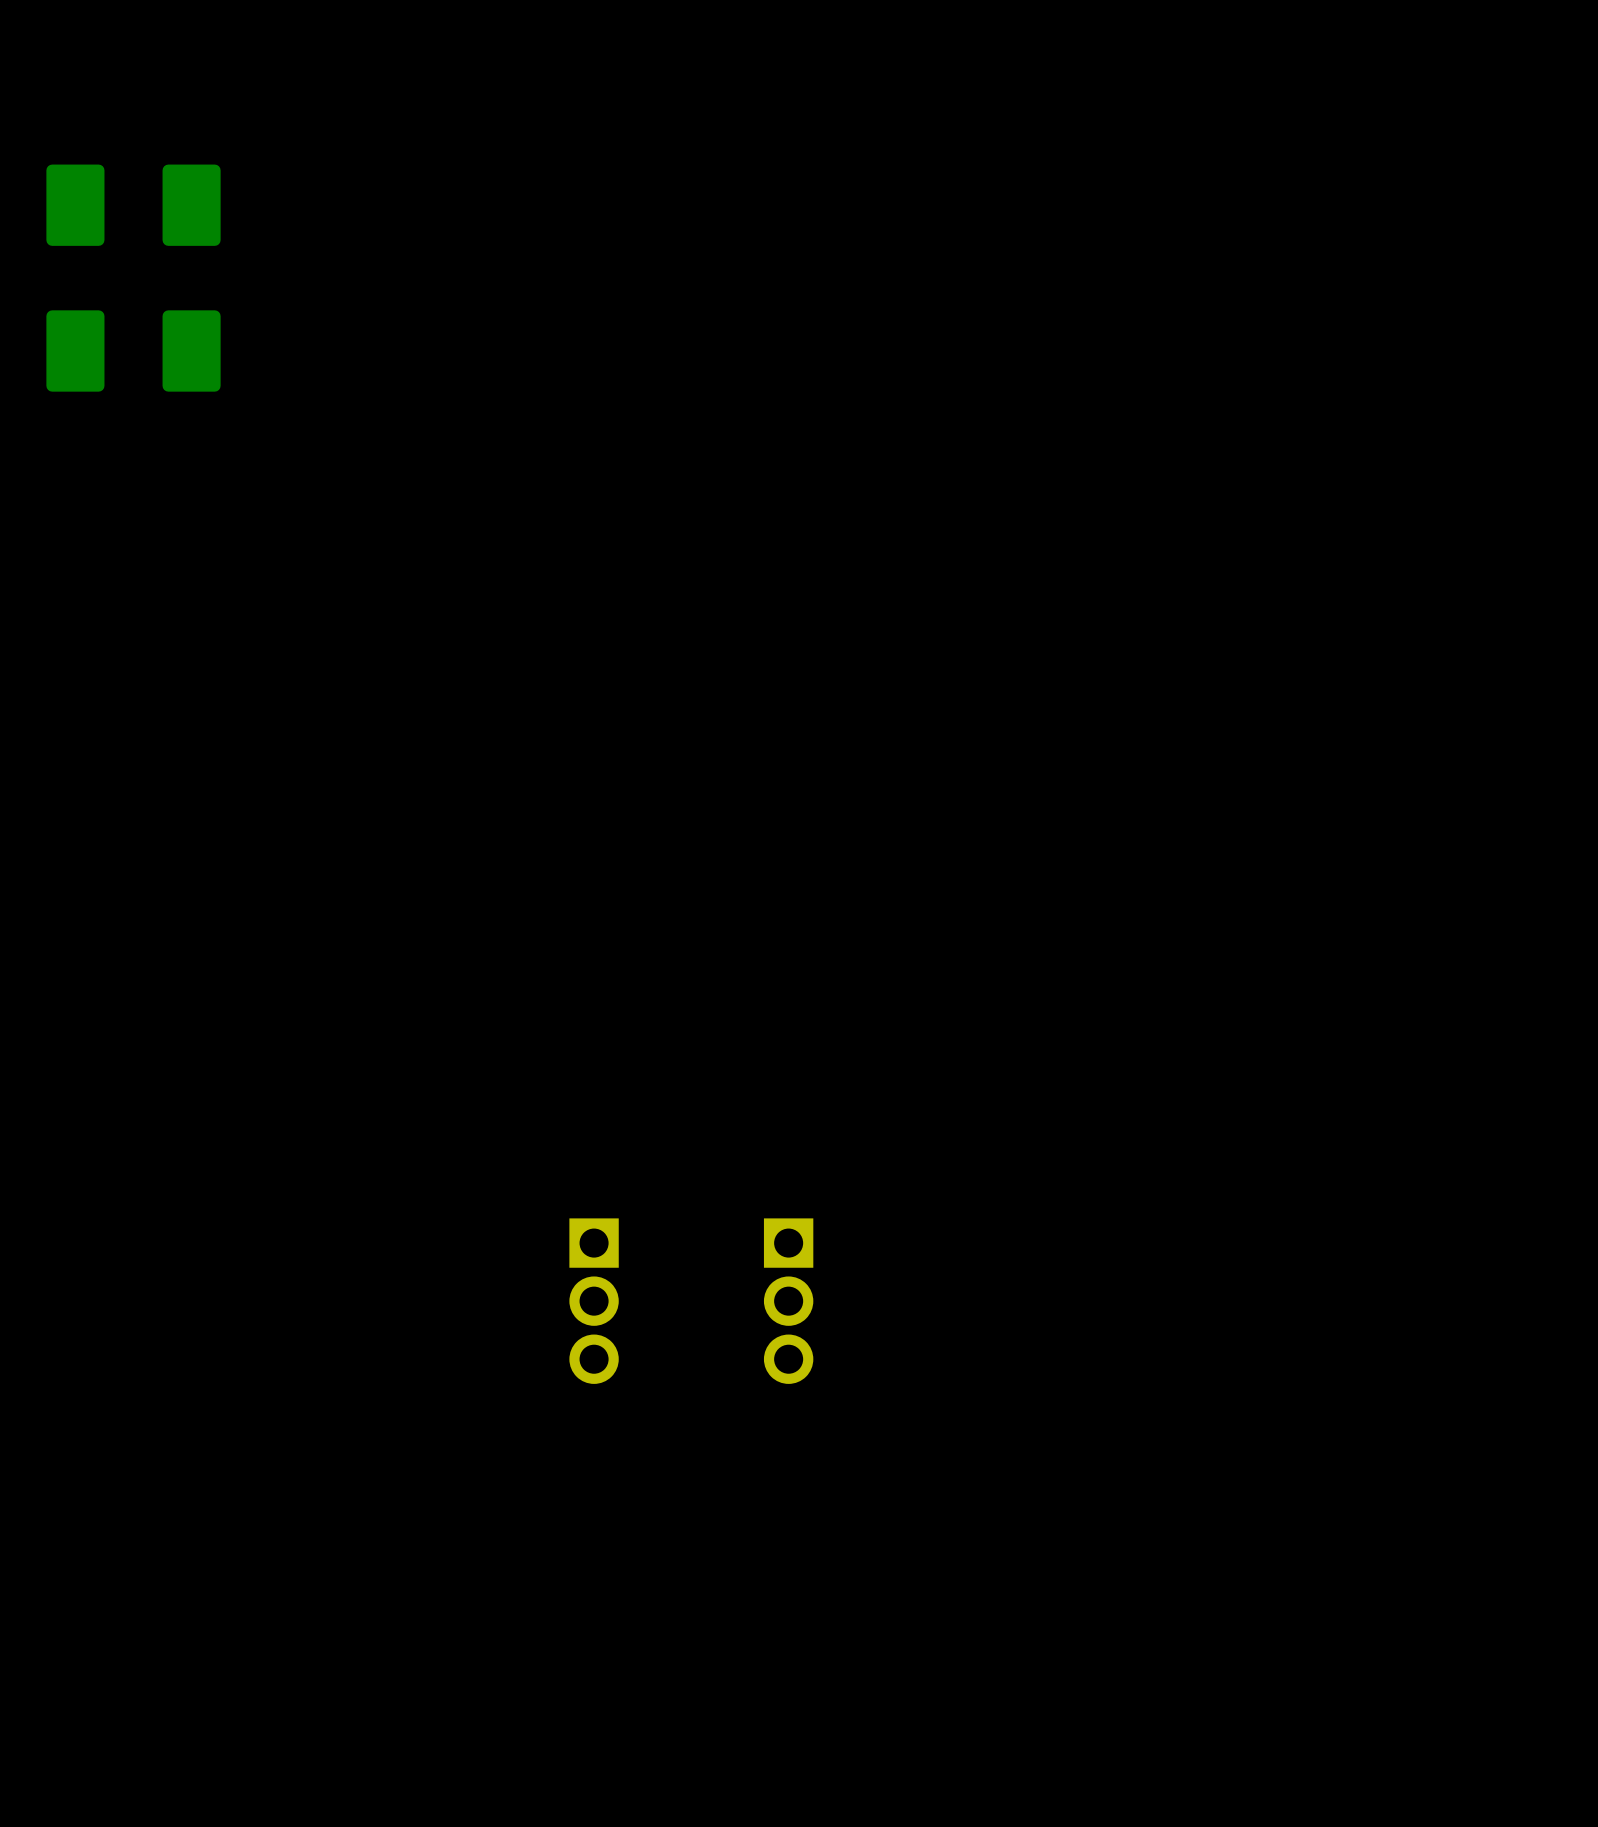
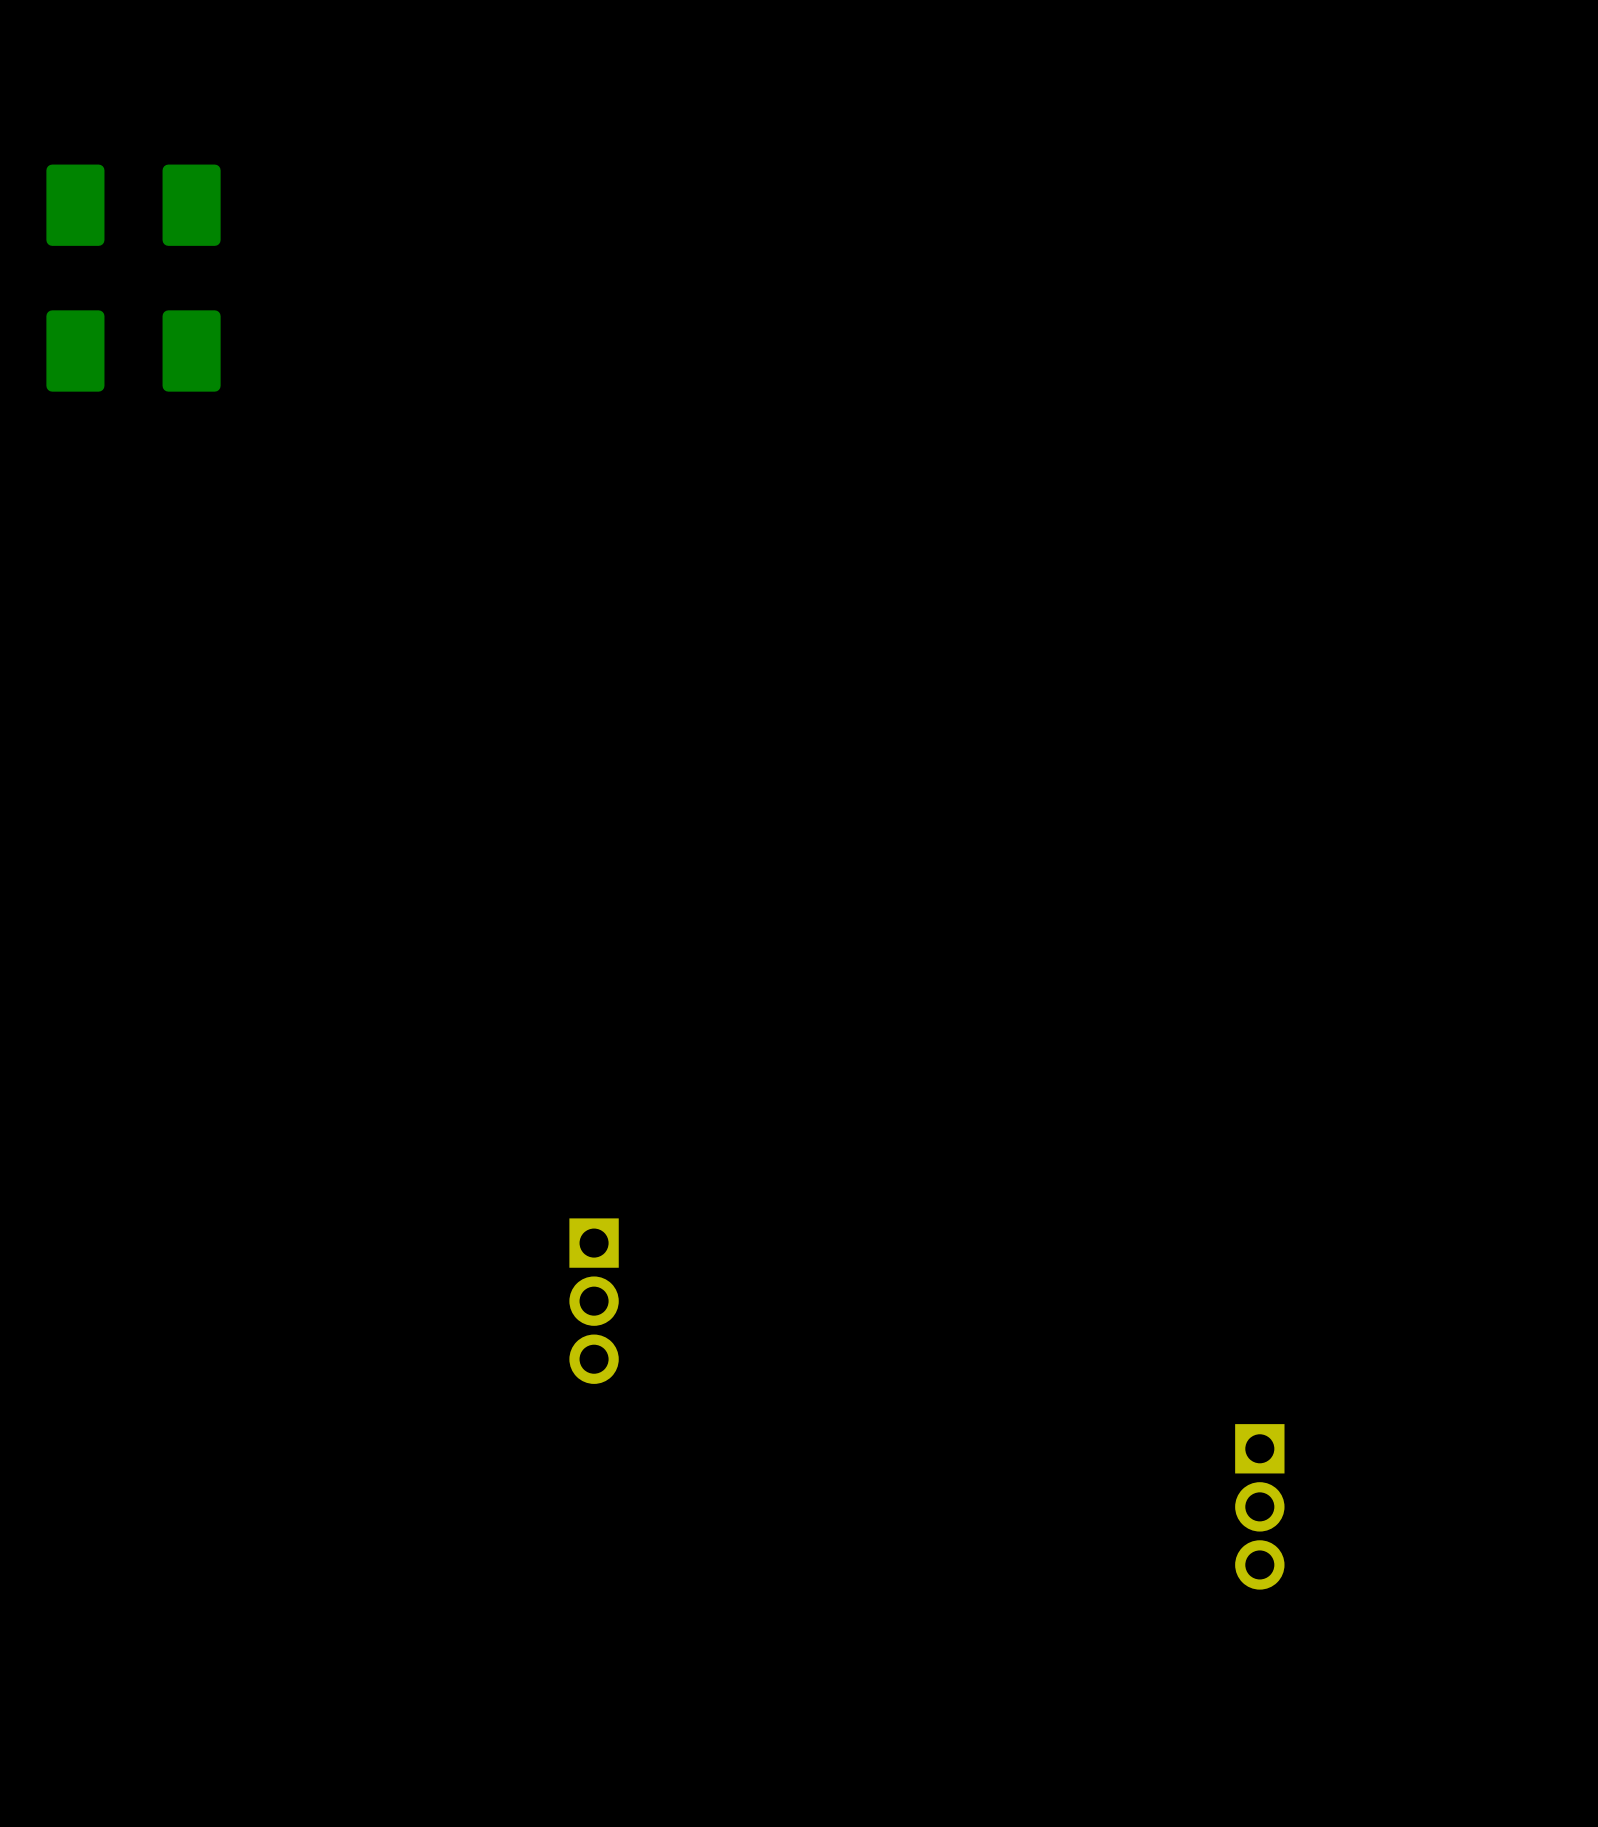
part position: (788, 1301) -> (1259, 1506)

